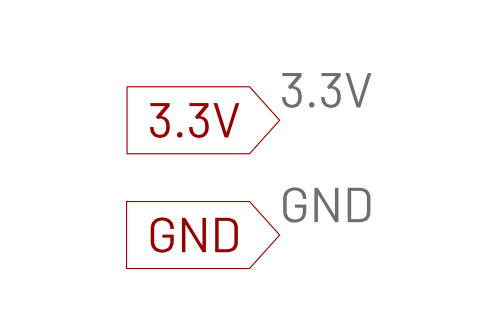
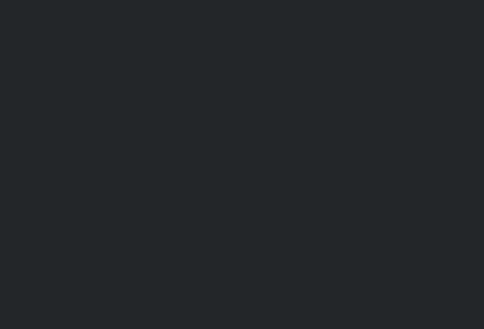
label: 3.3V (326, 90) -> none
global label: 3.3V (194, 120) -> none
label: GND (326, 204) -> none
global label: GND (194, 235) -> none

